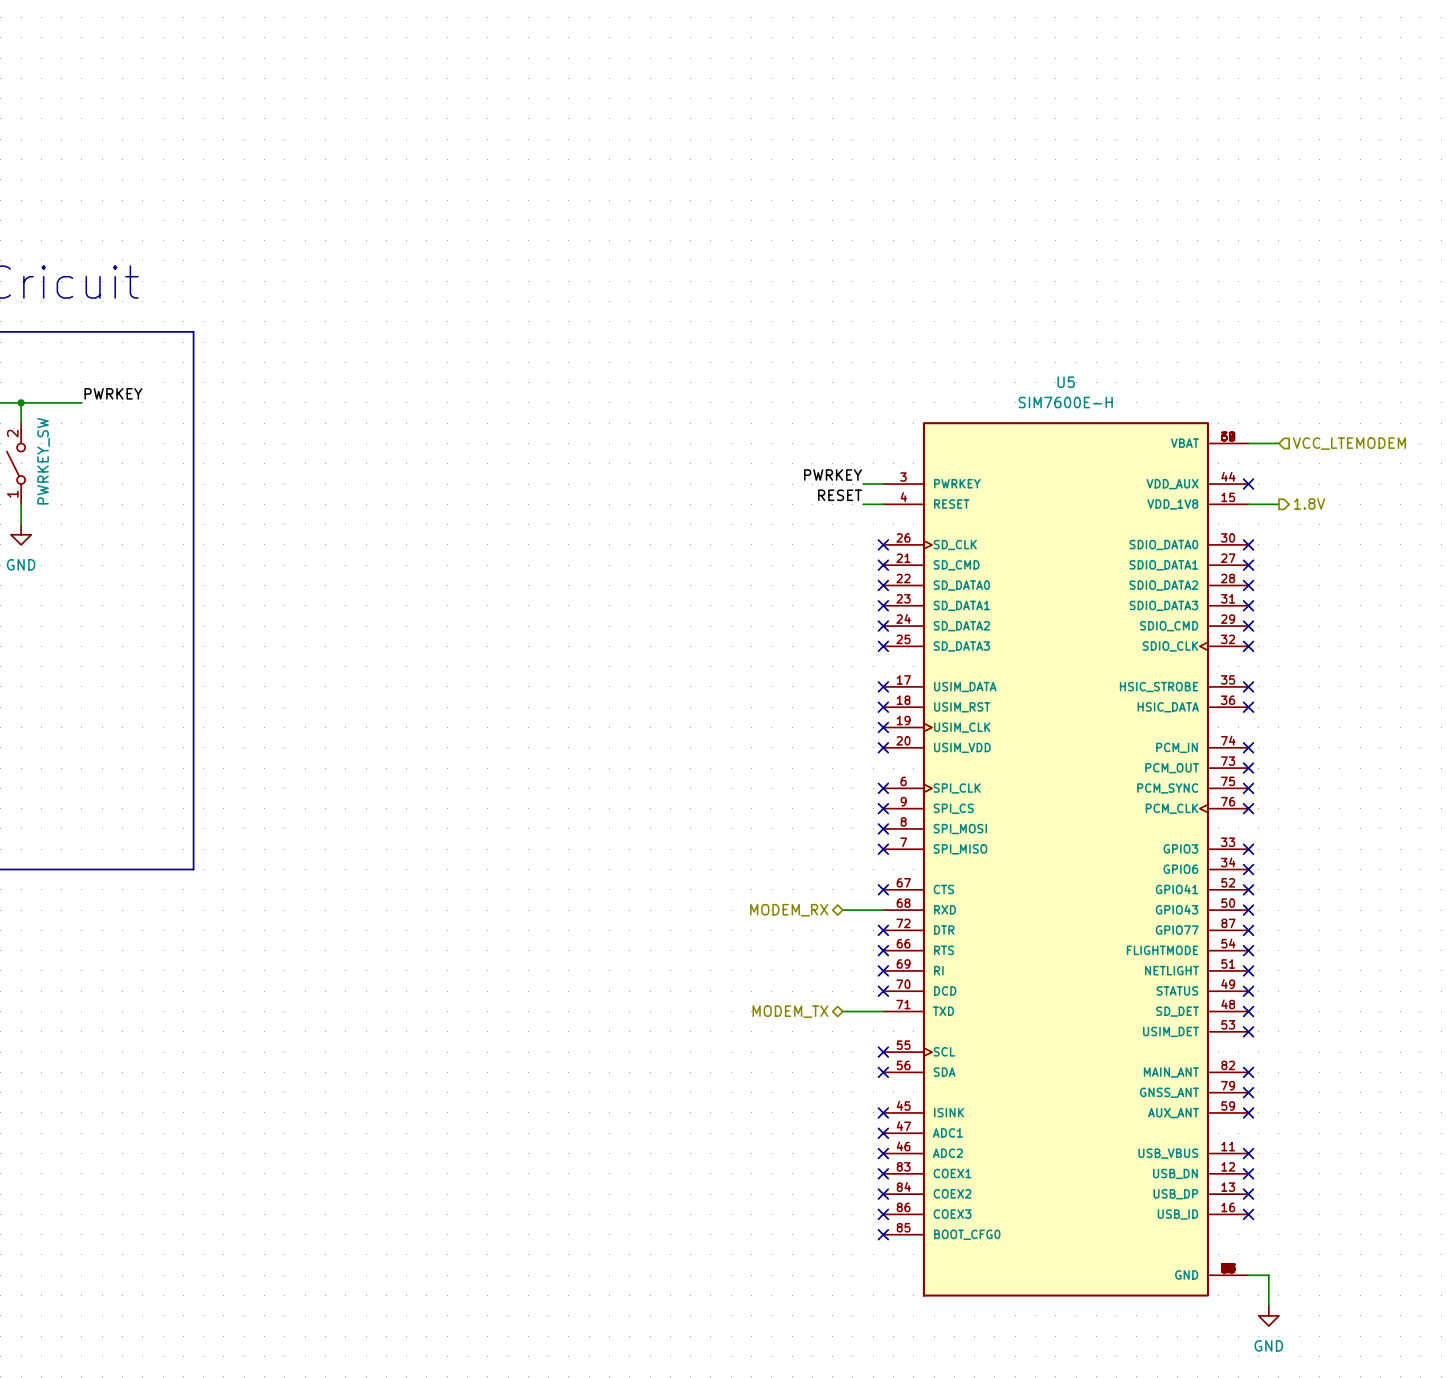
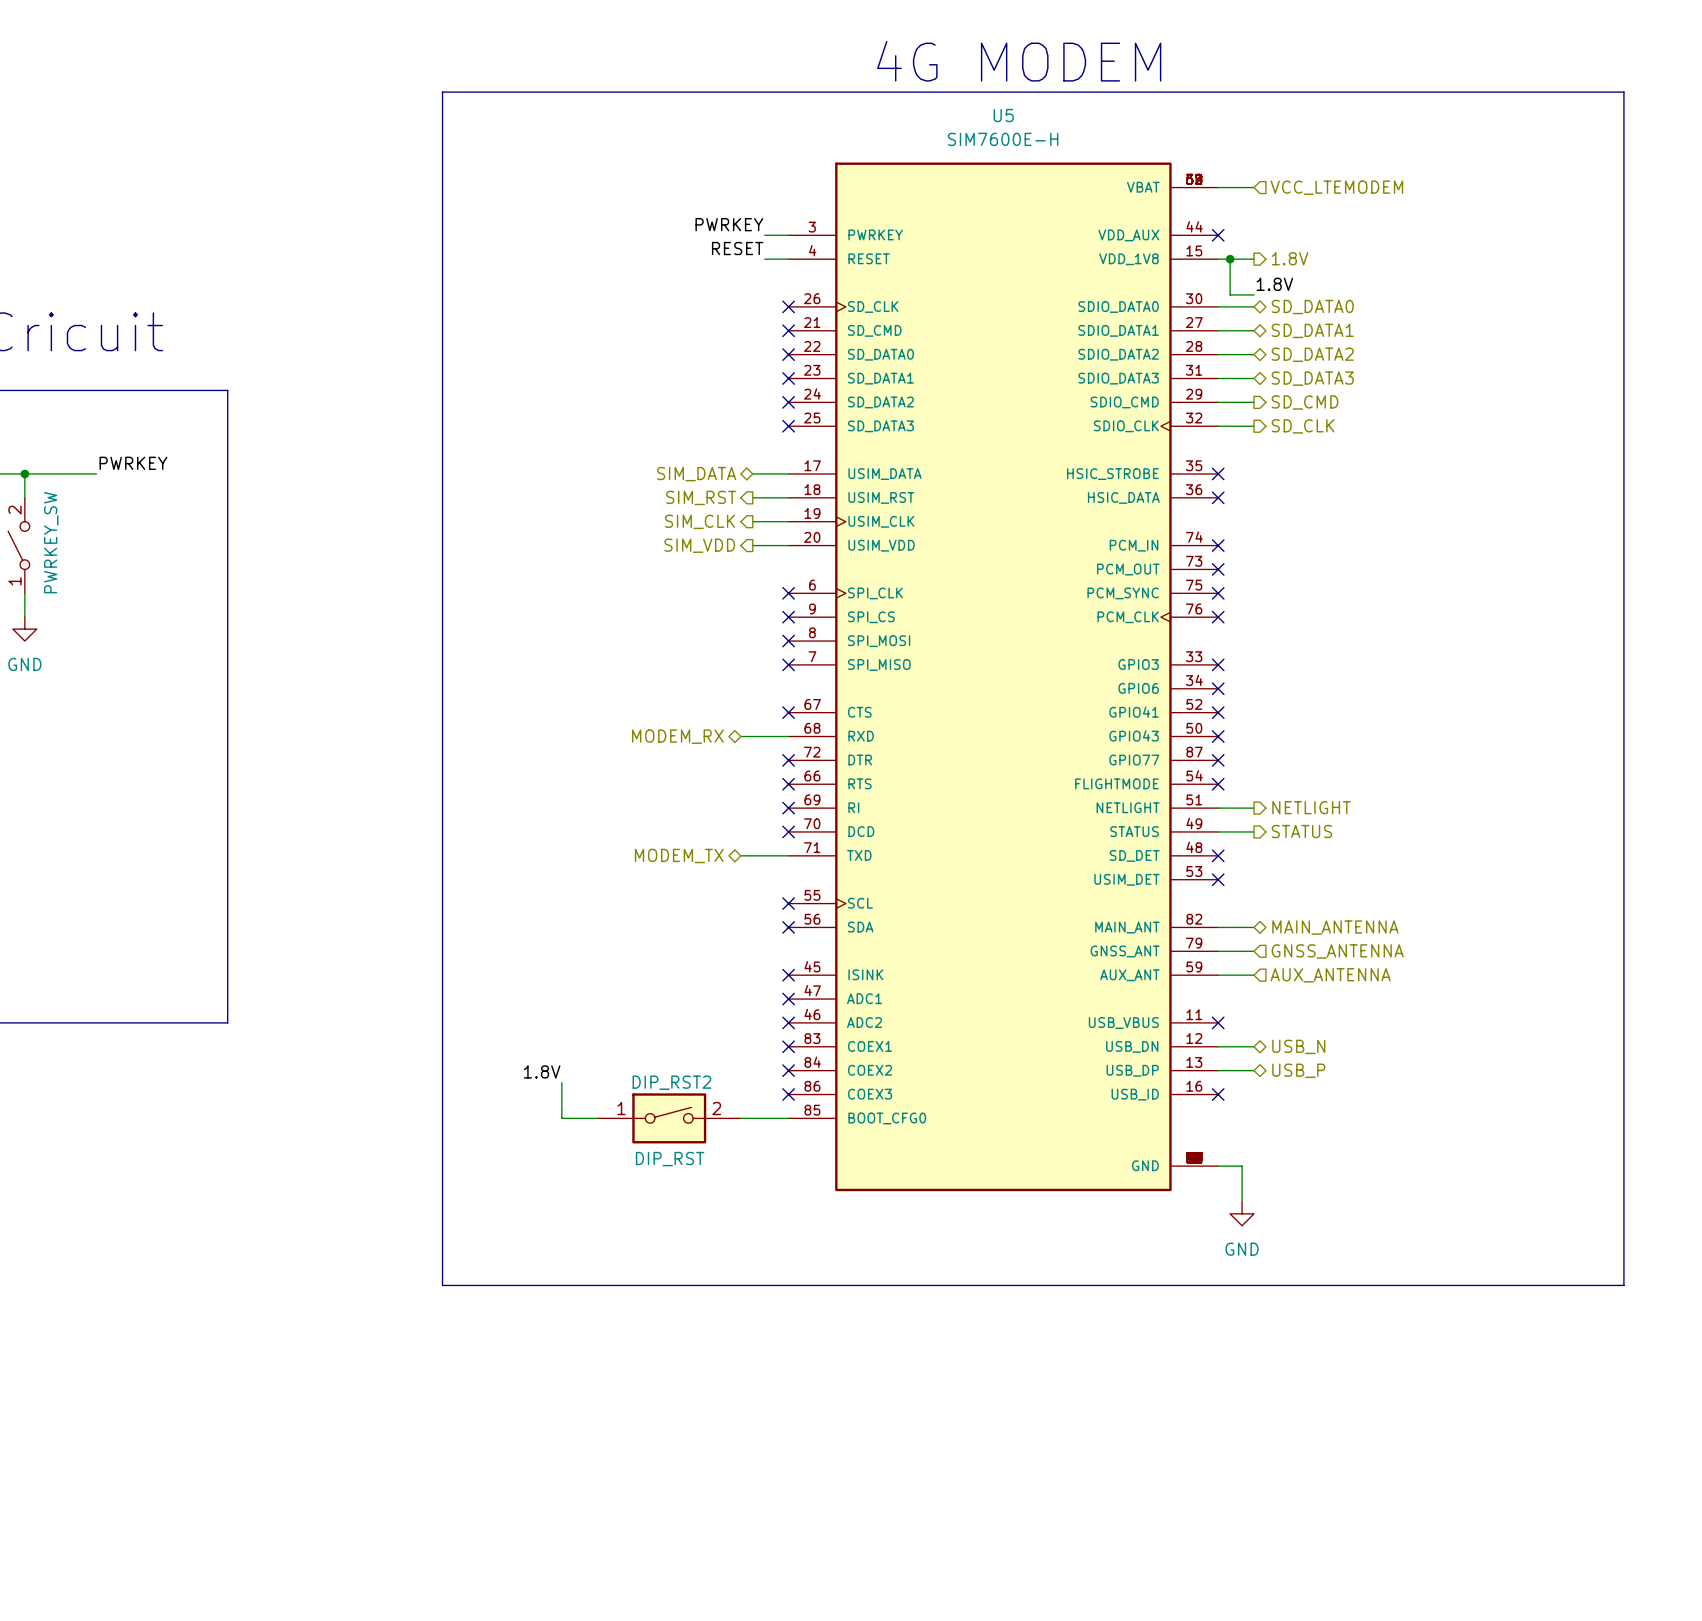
text: none -> 4G MODEM (1019, 61)
line: none -> (442, 92) (1623, 92) (1623, 1285) (442, 1285) (442, 92)
wire: none -> (1218, 187) (1253, 187)
hierarchical label: none -> VCC_LTEMODEM (1336, 187)
label: none -> PWRKEY (729, 224)
wire: none -> (764, 235) (788, 235)
no-connect mark: none -> (1218, 235)
label: none -> RESET (737, 248)
hierarchical label: none -> 1.8V (1289, 258)
wire: none -> (764, 259) (788, 259)
wire: none -> (1218, 259) (1253, 259)
wire: none -> (1230, 259) (1230, 294) (1253, 294)
junction: none -> (1230, 259)
label: none -> 1.8V (1274, 284)
no-connect mark: none -> (788, 306)
wire: none -> (1218, 306) (1253, 306)
hierarchical label: none -> SD_DATA0 (1312, 307)
no-connect mark: none -> (788, 330)
wire: none -> (1218, 330) (1253, 330)
hierarchical label: none -> SD_DATA1 (1312, 330)
no-connect mark: none -> (788, 354)
wire: none -> (1218, 354) (1253, 354)
hierarchical label: none -> SD_DATA2 (1312, 354)
no-connect mark: none -> (788, 378)
wire: none -> (1218, 378) (1253, 378)
hierarchical label: none -> SD_DATA3 (1312, 378)
no-connect mark: none -> (788, 402)
wire: none -> (1218, 402) (1253, 402)
hierarchical label: none -> SD_CMD (1305, 402)
no-connect mark: none -> (788, 426)
wire: none -> (1218, 426) (1253, 426)
hierarchical label: none -> SD_CLK (1303, 426)
wire: none -> (752, 473) (788, 473)
no-connect mark: none -> (1218, 473)
hierarchical label: none -> SIM_DATA (696, 474)
hierarchical label: none -> SIM_RST (701, 497)
wire: none -> (752, 497) (788, 497)
no-connect mark: none -> (1218, 497)
hierarchical label: none -> SIM_CLK (700, 521)
wire: none -> (752, 521) (788, 521)
wire: (1248, 443) (1278, 443) -> none
hierarchical label: VCC_LTEMODEM (1349, 443) -> none
hierarchical label: none -> SIM_VDD (699, 545)
wire: none -> (752, 545) (788, 545)
no-connect mark: none -> (1218, 545)
label: PWRKEY (833, 474) -> none
no-connect mark: none -> (1218, 569)
no-connect mark: (1248, 484) -> none
label: RESET (840, 495) -> none
hierarchical label: 1.8V (1309, 503) -> none
no-connect mark: none -> (788, 593)
no-connect mark: none -> (1218, 593)
wire: (1248, 504) (1278, 504) -> none
no-connect mark: none -> (788, 617)
no-connect mark: none -> (1218, 617)
no-connect mark: none -> (788, 641)
no-connect mark: (883, 544) -> none
no-connect mark: (1248, 544) -> none
no-connect mark: none -> (788, 664)
no-connect mark: (883, 565) -> none
no-connect mark: none -> (1218, 664)
no-connect mark: (1248, 565) -> none
no-connect mark: (883, 585) -> none
no-connect mark: none -> (1218, 688)
no-connect mark: (1248, 585) -> none
no-connect mark: none -> (788, 712)
no-connect mark: (883, 605) -> none
no-connect mark: none -> (1218, 712)
no-connect mark: (1248, 605) -> none
hierarchical label: none -> MODEM_RX (677, 736)
wire: none -> (740, 736) (788, 736)
no-connect mark: (883, 626) -> none
no-connect mark: none -> (1218, 736)
no-connect mark: (1248, 626) -> none
no-connect mark: none -> (788, 760)
no-connect mark: (883, 646) -> none
no-connect mark: none -> (1218, 760)
no-connect mark: (1248, 646) -> none
no-connect mark: none -> (788, 784)
no-connect mark: none -> (1218, 784)
no-connect mark: none -> (788, 808)
no-connect mark: (883, 686) -> none
hierarchical label: none -> NETLIGHT (1311, 807)
no-connect mark: (1248, 686) -> none
hierarchical label: none -> STATUS (1301, 831)
no-connect mark: none -> (788, 831)
no-connect mark: (883, 707) -> none
no-connect mark: (1248, 707) -> none
hierarchical label: none -> MODEM_TX (679, 855)
wire: none -> (740, 855) (788, 855)
no-connect mark: (883, 727) -> none
no-connect mark: none -> (1218, 855)
no-connect mark: (883, 747) -> none
no-connect mark: none -> (1218, 879)
no-connect mark: (1248, 747) -> none
no-connect mark: none -> (788, 903)
no-connect mark: (1248, 768) -> none
no-connect mark: none -> (788, 927)
no-connect mark: (883, 788) -> none
hierarchical label: none -> MAIN_ANTENNA (1335, 927)
no-connect mark: (1248, 788) -> none
no-connect mark: (883, 808) -> none
hierarchical label: none -> GNSS_ANTENNA (1337, 951)
no-connect mark: (1248, 808) -> none
no-connect mark: none -> (788, 975)
no-connect mark: (883, 828) -> none
hierarchical label: none -> AUX_ANTENNA (1330, 975)
no-connect mark: none -> (788, 999)
no-connect mark: (883, 849) -> none
no-connect mark: (1248, 849) -> none
U5 position: (1065, 859) -> (1003, 676)
no-connect mark: none -> (788, 1022)
no-connect mark: none -> (1218, 1022)
no-connect mark: (1248, 869) -> none
no-connect mark: none -> (788, 1046)
no-connect mark: (883, 889) -> none
hierarchical label: none -> USB_N (1298, 1046)
no-connect mark: (1248, 889) -> none
no-connect mark: none -> (788, 1070)
hierarchical label: MODEM_RX (789, 910) -> none
hierarchical label: none -> USB_P (1298, 1070)
no-connect mark: (1248, 910) -> none
label: none -> 1.8V (542, 1071)
wire: none -> (561, 1082) (561, 1118) (597, 1118)
no-connect mark: none -> (788, 1094)
no-connect mark: (883, 930) -> none
no-connect mark: none -> (1218, 1094)
no-connect mark: (1248, 930) -> none
DIP_RST2: none -> DIP_RST (669, 1118)
wire: none -> (740, 1118) (788, 1118)
no-connect mark: (883, 950) -> none
no-connect mark: (1248, 950) -> none
no-connect mark: (883, 970) -> none
no-connect mark: (1248, 970) -> none
no-connect mark: (883, 991) -> none
no-connect mark: (1248, 991) -> none
hierarchical label: MODEM_TX (790, 1011) -> none
no-connect mark: (1248, 1011) -> none
power symbol: none -> GND (1242, 1213)
no-connect mark: (1248, 1031) -> none
no-connect mark: (883, 1052) -> none
no-connect mark: (883, 1072) -> none
no-connect mark: (1248, 1072) -> none
no-connect mark: (1248, 1092) -> none
no-connect mark: (883, 1112) -> none
no-connect mark: (1248, 1112) -> none
no-connect mark: (883, 1133) -> none
no-connect mark: (883, 1153) -> none
no-connect mark: (1248, 1153) -> none
no-connect mark: (883, 1173) -> none
no-connect mark: (1248, 1173) -> none
no-connect mark: (883, 1194) -> none
no-connect mark: (1248, 1194) -> none
no-connect mark: (883, 1214) -> none
no-connect mark: (1248, 1214) -> none
no-connect mark: (883, 1234) -> none
wire: (1248, 1275) (1268, 1275) (1268, 1305) -> none
power symbol: GND (1268, 1315) -> none

